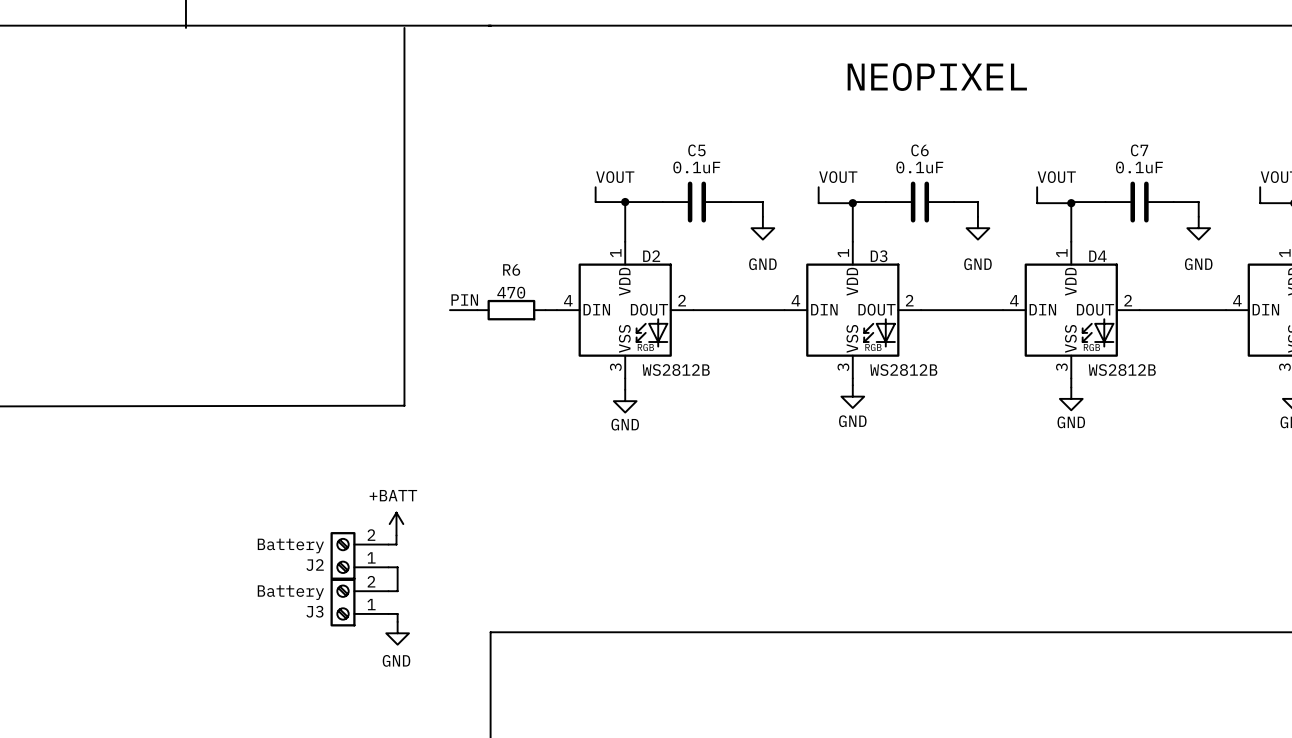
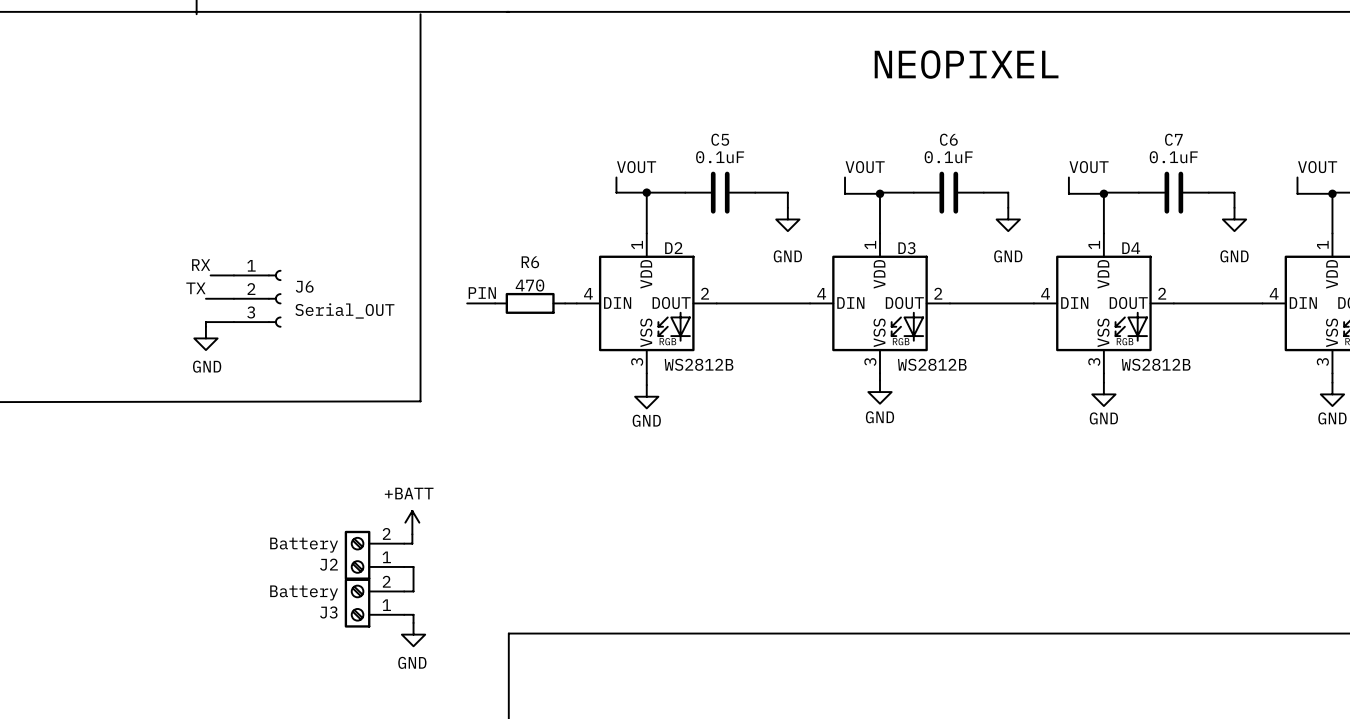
label: none -> RX (201, 265)
wire: none -> (210, 275) (233, 275)
label: none -> TX (195, 288)
wire: none -> (205, 298) (233, 298)
J6: none -> Serial_OUT (257, 298)
wire: none -> (233, 322) (205, 322) (205, 326)
power symbol: none -> GND (205, 338)

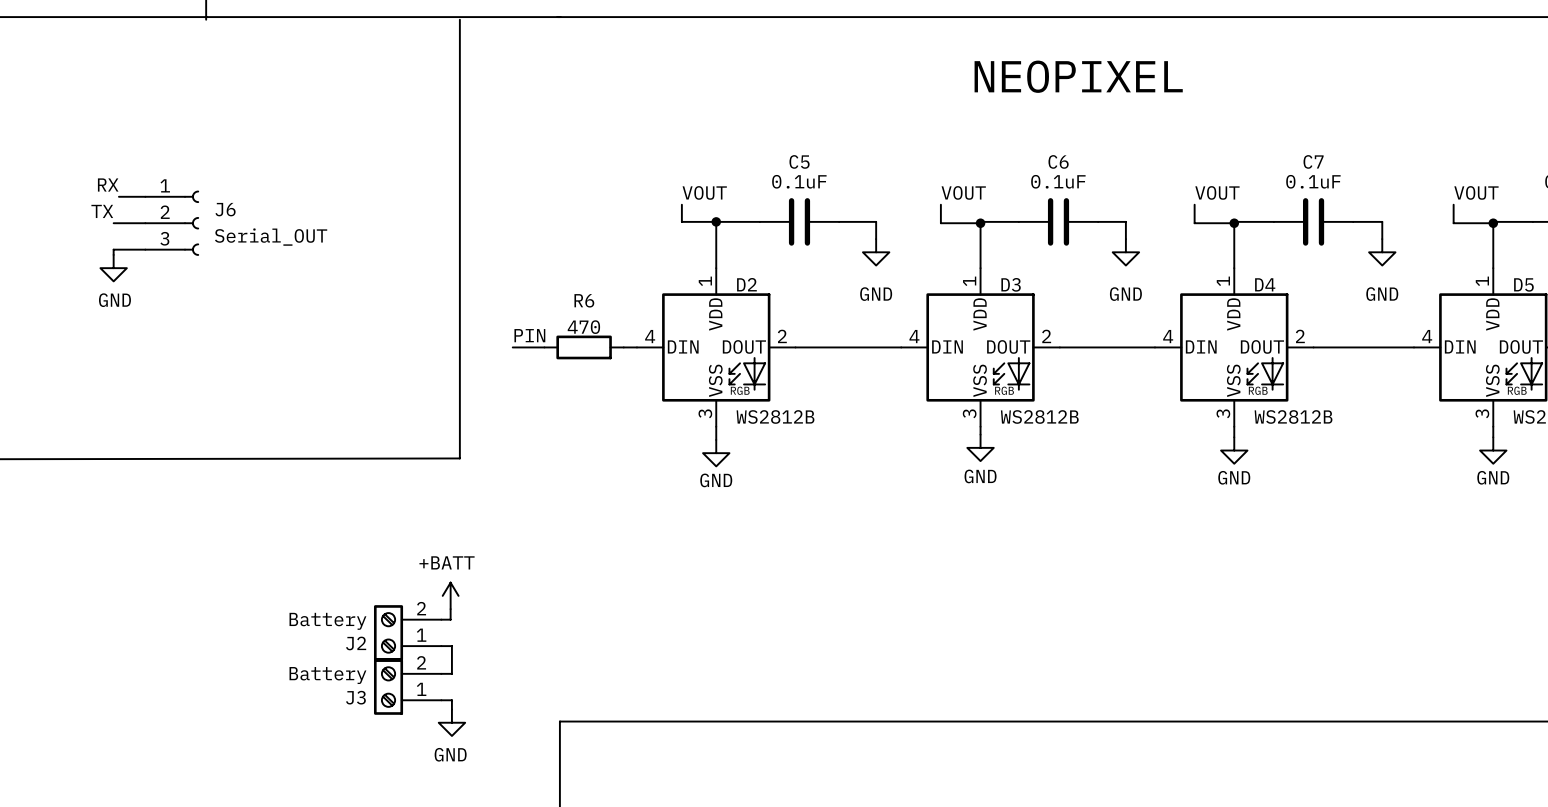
label position: RX (201, 265) -> RX (108, 185)
wire: (210, 275) (233, 275) -> (118, 196) (145, 196)
label position: TX (195, 288) -> TX (102, 211)
wire: (205, 298) (233, 298) -> (113, 223) (145, 223)
J6 position: (257, 298) -> (172, 223)
wire: (233, 322) (205, 322) (205, 326) -> (145, 249) (113, 249) (113, 254)
power symbol position: GND (205, 338) -> GND (113, 268)

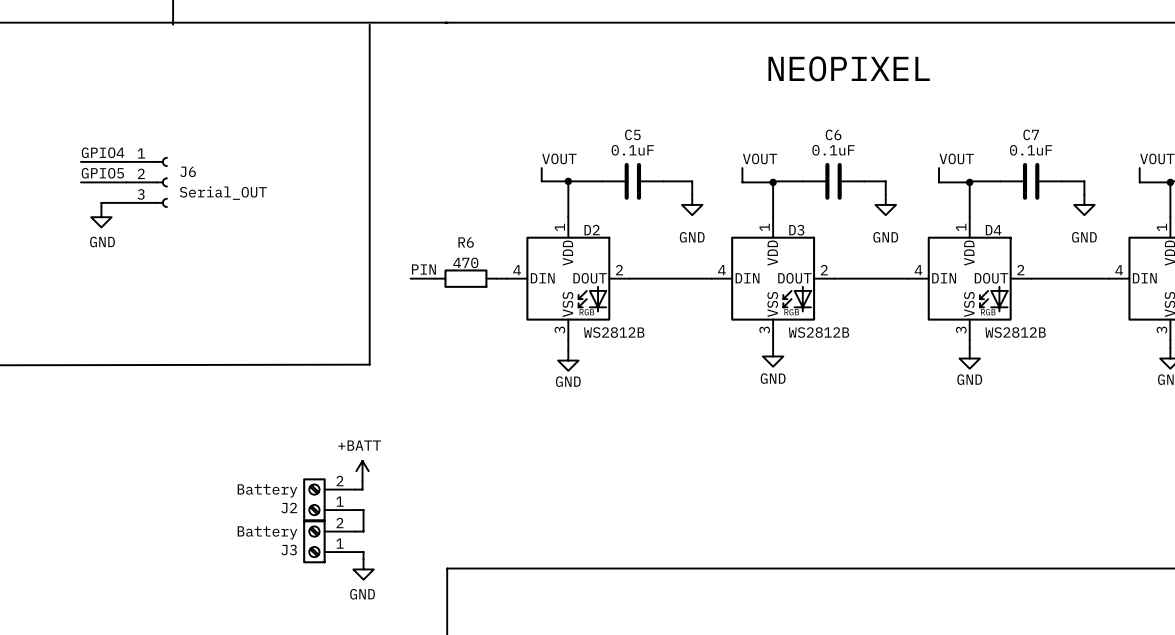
label: RX (108, 185) -> none
label: none -> GPIO4 (103, 152)
wire: none -> (80, 161) (105, 161)
label: TX (102, 211) -> none
label: none -> GPIO5 (102, 173)
wire: none -> (80, 182) (101, 182)

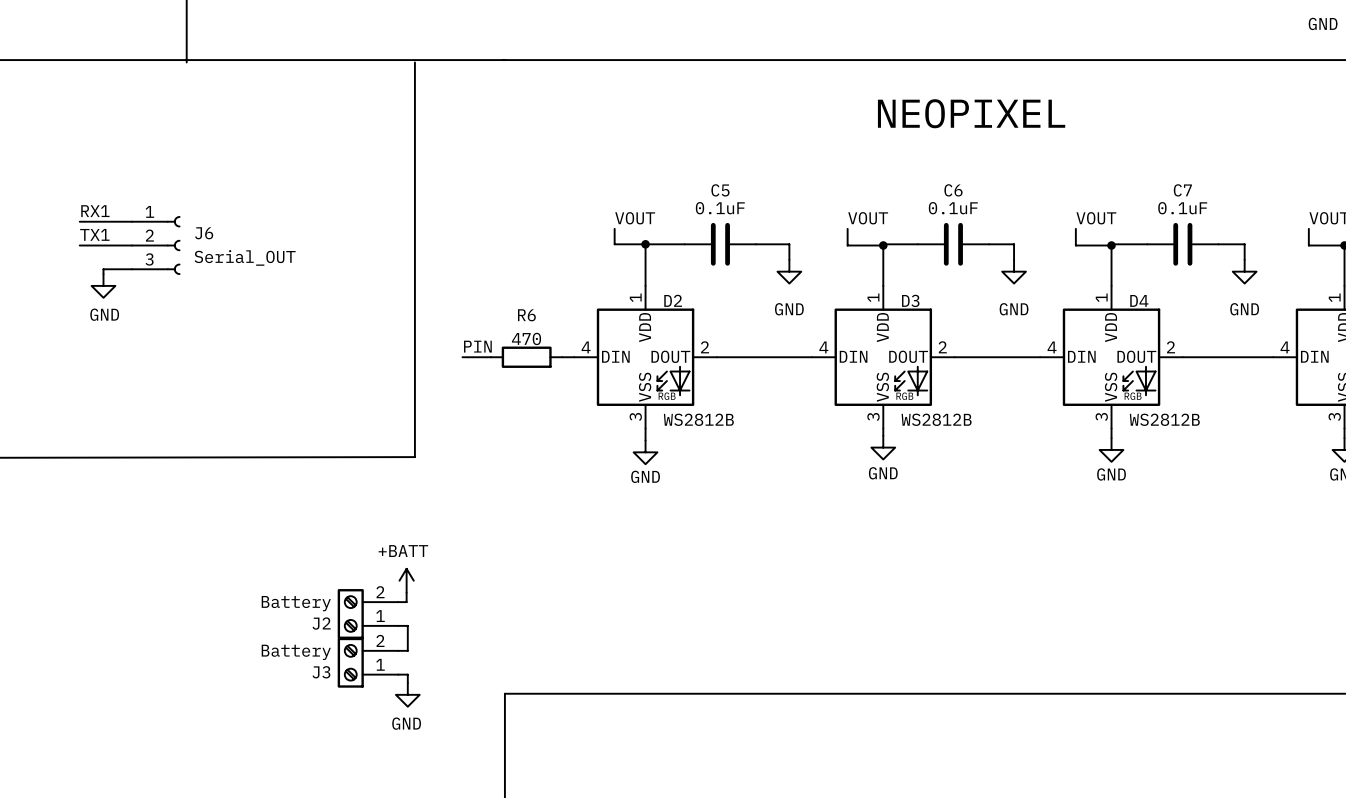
label: GPIO4 (103, 152) -> RX1 (95, 211)
label: GPIO5 (102, 173) -> TX1 (94, 234)

